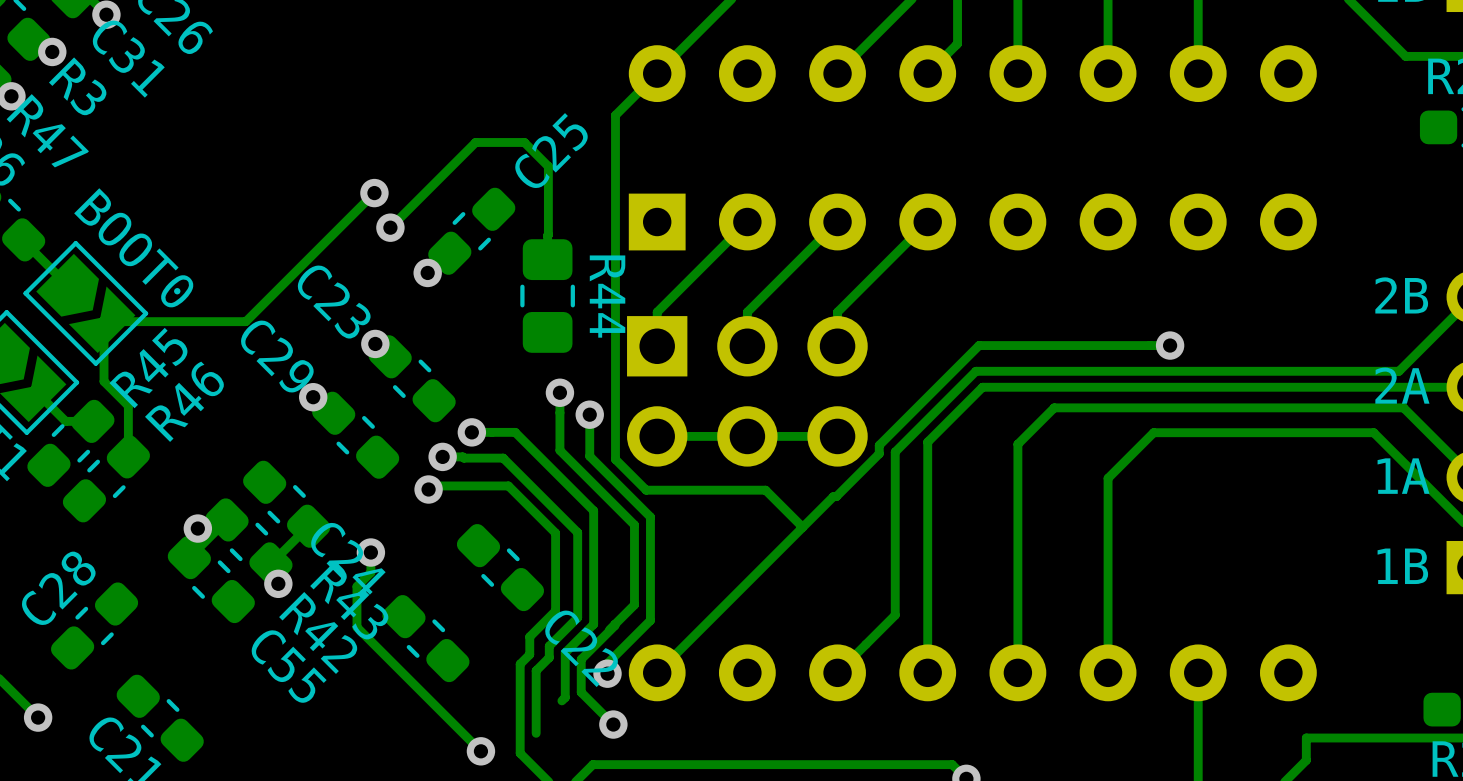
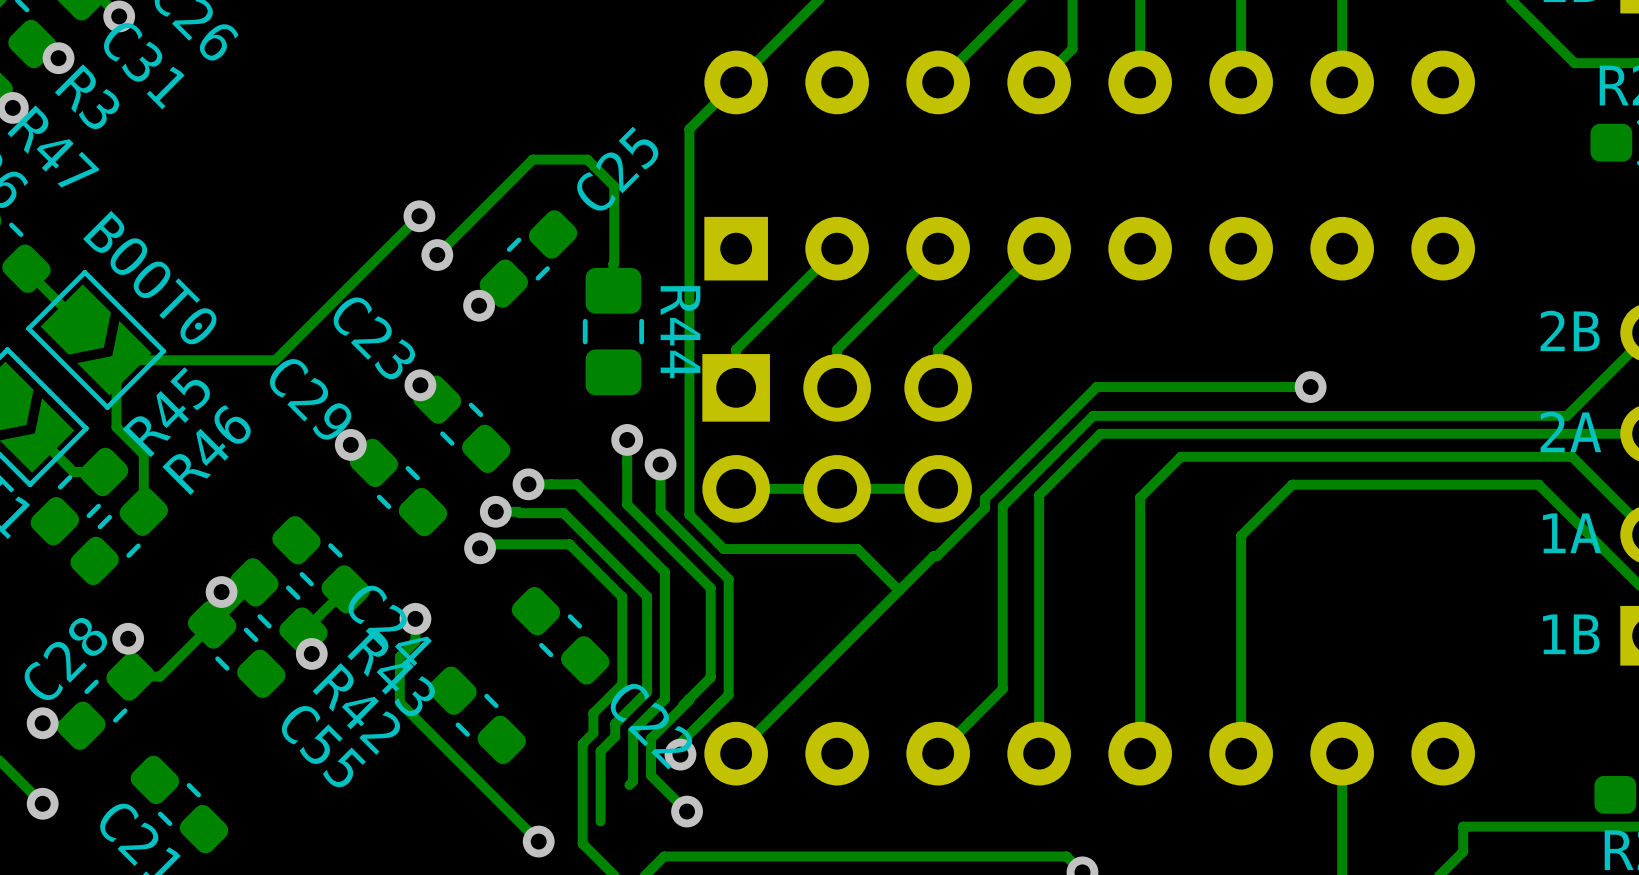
track: none -> (212, 624) (160, 676) (130, 676) (130, 641) (128, 638)
via: none -> (128, 638)
via: none -> (42, 723)

